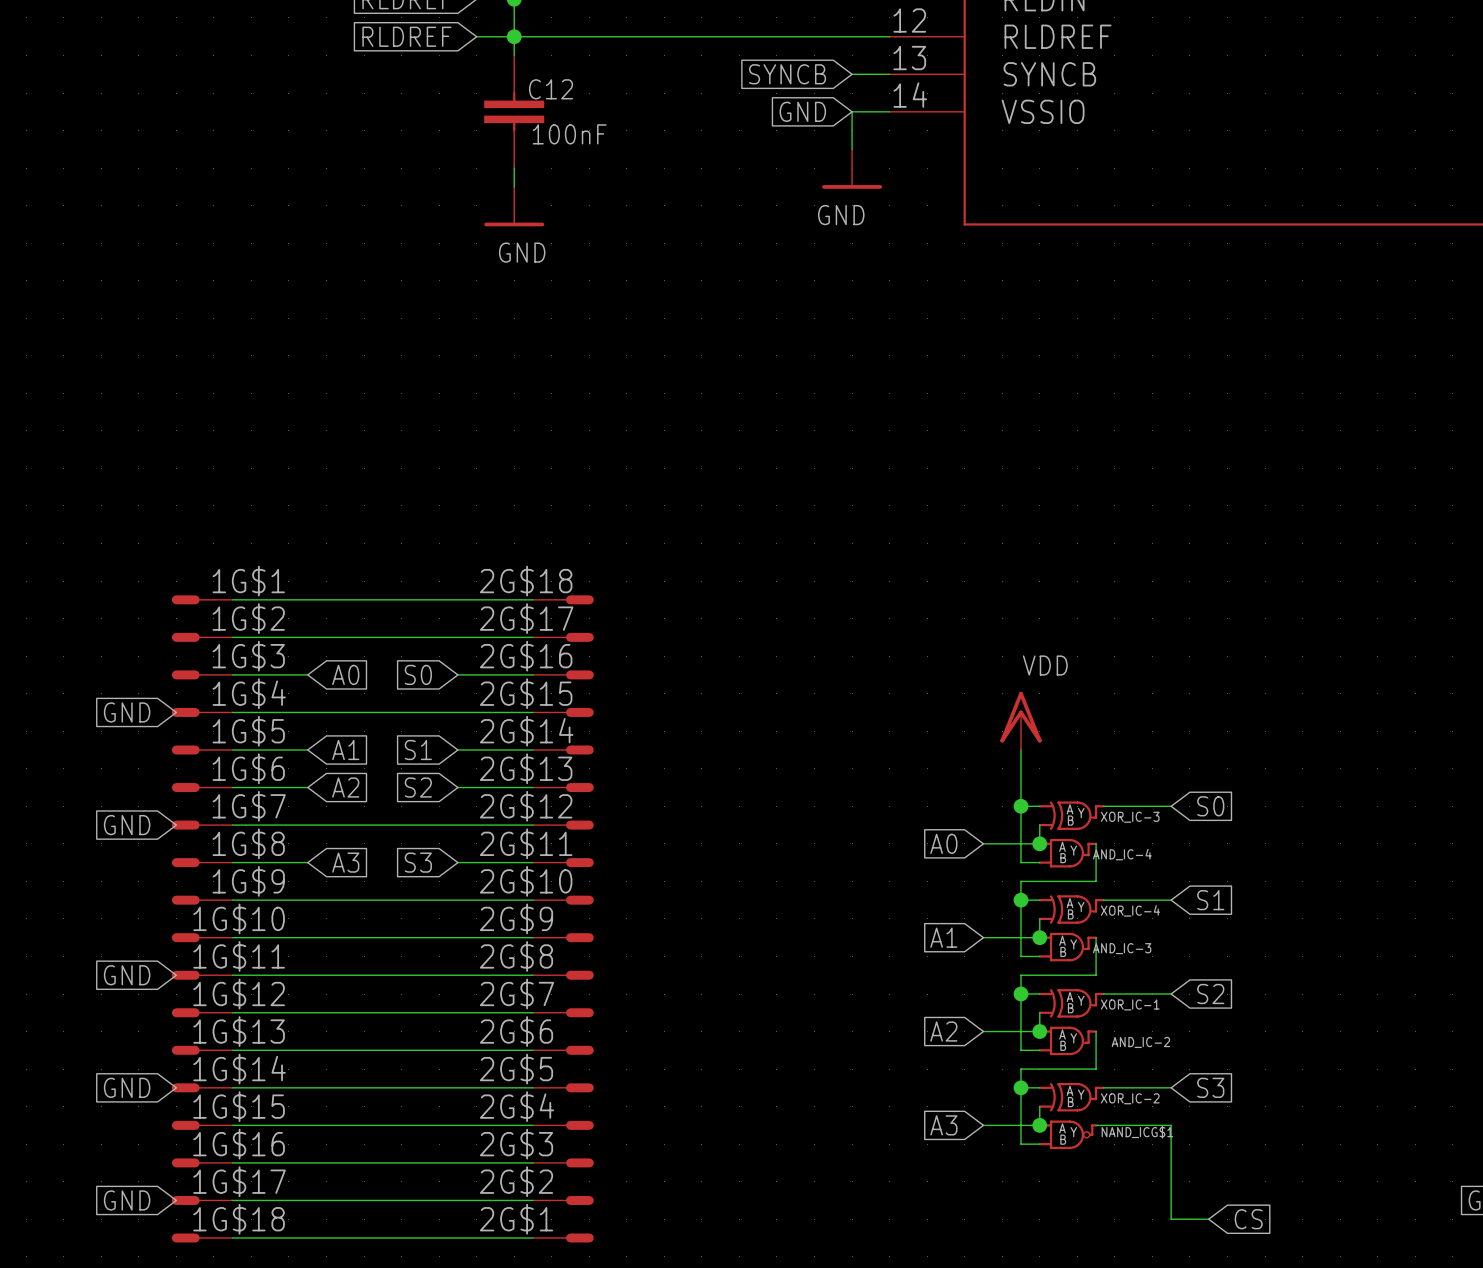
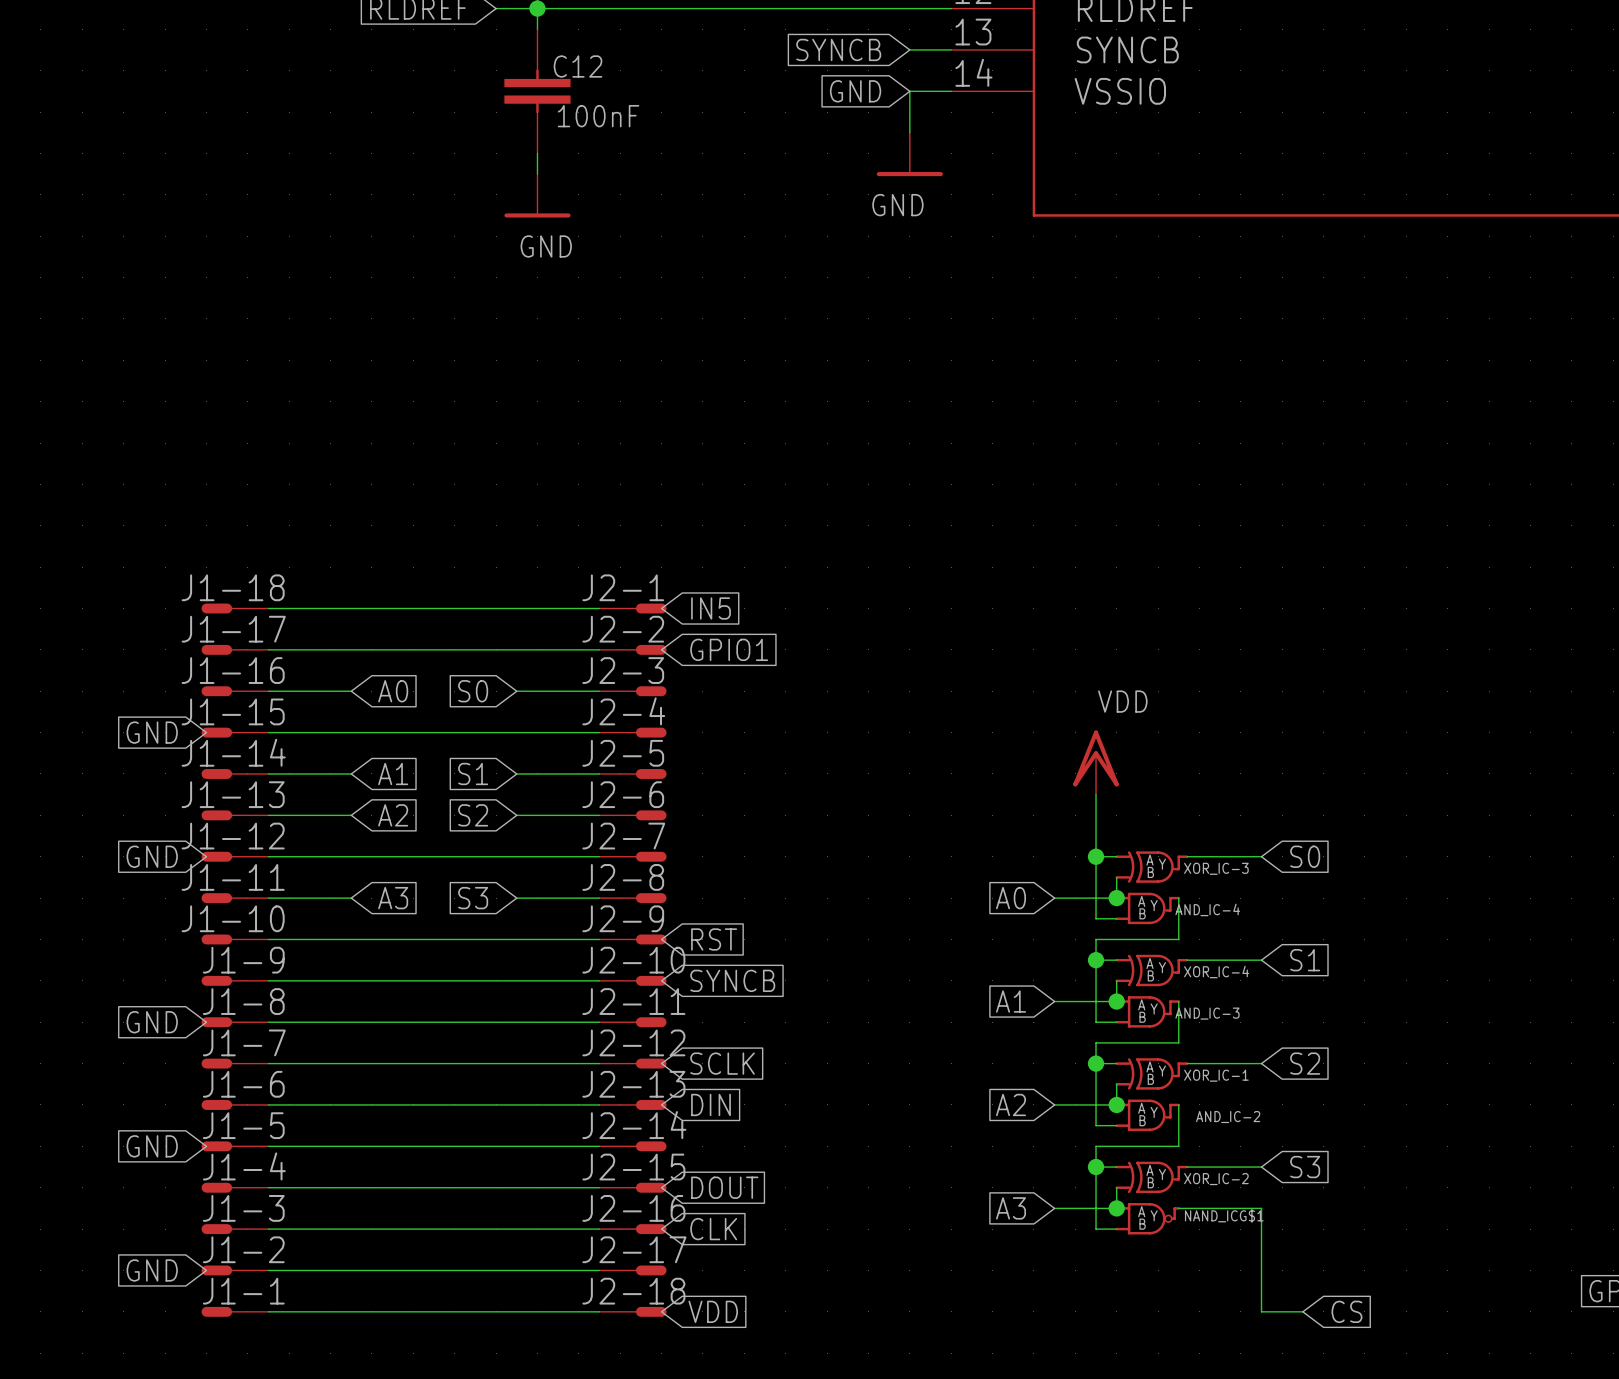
J1-18: none -> (235, 608)
J2-1: none -> (633, 608)
global label: none -> IN5 (711, 608)
1G$1: (202, 599) -> none
wire: (232, 599) (532, 599) -> (268, 608) (599, 608)
2G$18: (563, 599) -> none
J1-17: none -> (235, 649)
J2-2: none -> (633, 649)
global label: none -> GPIO1 (729, 649)
1G$2: (202, 637) -> none
wire: (232, 637) (532, 637) -> (268, 649) (599, 649)
2G$17: (563, 637) -> none
J1-16: none -> (235, 691)
J2-3: none -> (633, 691)
1G$3: (202, 674) -> none
wire: (232, 674) (307, 674) -> (268, 691) (351, 691)
global label position: A0 (345, 674) -> A0 (393, 691)
global label position: S0 (418, 674) -> S0 (473, 691)
wire: (457, 674) (532, 674) -> (516, 691) (599, 691)
2G$16: (563, 674) -> none
J1-15: none -> (235, 732)
J2-4: none -> (633, 732)
global label position: GND (127, 712) -> GND (152, 732)
1G$4: (202, 712) -> none
wire: (232, 712) (532, 712) -> (268, 732) (599, 732)
2G$15: (563, 712) -> none
J1-14: none -> (235, 773)
J2-5: none -> (633, 773)
1G$5: (202, 749) -> none
wire: (232, 749) (307, 749) -> (268, 773) (351, 773)
global label position: A1 (345, 749) -> A1 (393, 773)
global label position: S1 (418, 749) -> S1 (473, 773)
wire: (457, 749) (532, 749) -> (516, 773) (599, 773)
2G$14: (563, 749) -> none
J1-13: none -> (235, 815)
J2-6: none -> (633, 815)
1G$6: (202, 787) -> none
wire: (232, 787) (307, 787) -> (268, 815) (351, 815)
global label position: A2 (345, 787) -> A2 (393, 815)
global label position: S2 (418, 787) -> S2 (473, 815)
wire: (457, 787) (532, 787) -> (516, 815) (599, 815)
2G$13: (563, 787) -> none
J1-12: none -> (235, 856)
J2-7: none -> (633, 856)
global label position: GND (127, 825) -> GND (152, 856)
1G$7: (202, 825) -> none
wire: (232, 825) (532, 825) -> (268, 856) (599, 856)
2G$12: (563, 825) -> none
J1-11: none -> (235, 898)
J2-8: none -> (633, 898)
1G$8: (202, 862) -> none
wire: (232, 862) (307, 862) -> (268, 898) (351, 898)
global label position: A3 (345, 862) -> A3 (393, 898)
global label position: S3 (418, 862) -> S3 (473, 898)
wire: (457, 862) (532, 862) -> (516, 898) (599, 898)
2G$11: (563, 862) -> none
J1-10: none -> (235, 939)
J2-9: none -> (633, 939)
global label: none -> RST (714, 939)
1G$9: (202, 900) -> none
wire: (232, 900) (532, 900) -> (268, 939) (599, 939)
2G$10: (563, 900) -> none
J1-9: none -> (235, 980)
J2-10: none -> (633, 980)
global label: none -> SYNCB (732, 980)
1G$10: (202, 937) -> none
wire: (232, 937) (532, 937) -> (268, 980) (599, 980)
2G$9: (563, 937) -> none
J1-8: none -> (235, 1022)
J2-11: none -> (633, 1022)
global label position: GND (127, 975) -> GND (152, 1022)
1G$11: (202, 975) -> none
wire: (232, 975) (532, 975) -> (268, 1022) (599, 1022)
2G$8: (563, 975) -> none
J1-7: none -> (235, 1063)
J2-12: none -> (633, 1063)
global label: none -> SCLK (722, 1063)
1G$12: (202, 1012) -> none
wire: (232, 1012) (532, 1012) -> (268, 1063) (599, 1063)
2G$7: (563, 1012) -> none
J1-6: none -> (235, 1104)
J2-13: none -> (633, 1104)
global label: none -> DIN (711, 1104)
1G$13: (202, 1050) -> none
wire: (232, 1050) (532, 1050) -> (268, 1104) (599, 1104)
2G$6: (563, 1050) -> none
J1-5: none -> (235, 1146)
J2-14: none -> (633, 1146)
global label position: GND (127, 1087) -> GND (152, 1146)
1G$14: (202, 1087) -> none
wire: (232, 1087) (532, 1087) -> (268, 1146) (599, 1146)
2G$5: (563, 1087) -> none
J1-4: none -> (235, 1187)
J2-15: none -> (633, 1187)
global label: none -> DOUT (724, 1187)
1G$15: (202, 1125) -> none
wire: (232, 1125) (532, 1125) -> (268, 1187) (599, 1187)
2G$4: (563, 1125) -> none
J1-3: none -> (235, 1229)
J2-16: none -> (633, 1229)
global label: none -> CLK (713, 1229)
1G$16: (202, 1162) -> none
wire: (232, 1162) (532, 1162) -> (268, 1229) (599, 1229)
2G$3: (563, 1162) -> none
J1-2: none -> (235, 1270)
J2-17: none -> (633, 1270)
global label position: GND (127, 1200) -> GND (152, 1270)
1G$17: (202, 1200) -> none
wire: (232, 1200) (532, 1200) -> (268, 1270) (599, 1270)
2G$2: (563, 1200) -> none
J1-1: none -> (235, 1311)
J2-18: none -> (633, 1311)
global label: none -> VDD (713, 1311)
1G$18: (202, 1238) -> none
wire: (232, 1238) (532, 1238) -> (268, 1311) (599, 1311)
2G$1: (563, 1238) -> none

